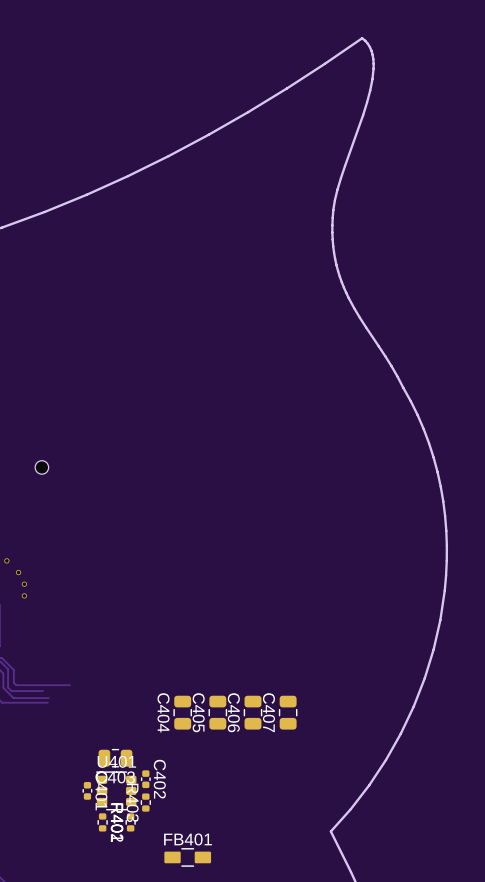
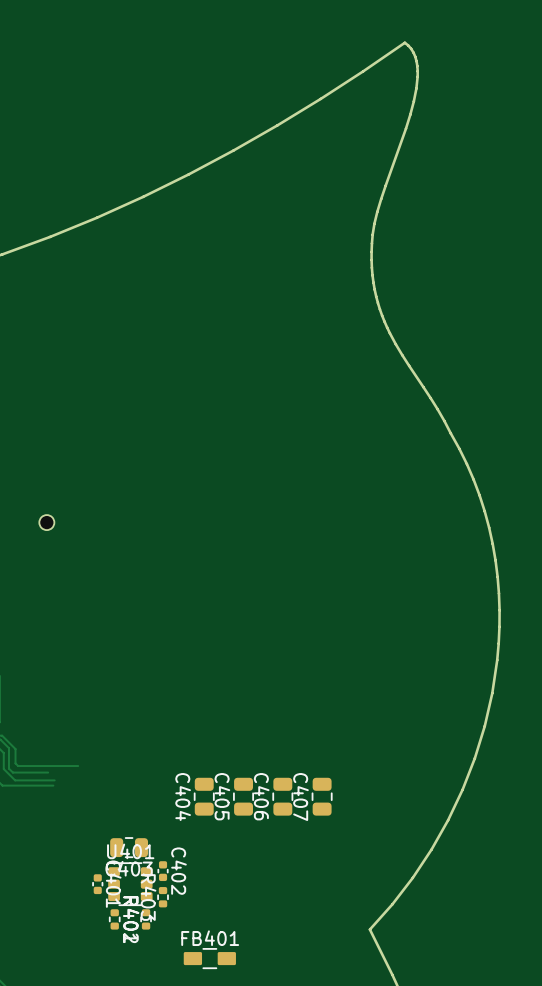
via: (6, 560) -> none
via: (18, 572) -> none
via: (24, 584) -> none
via: (24, 595) -> none

